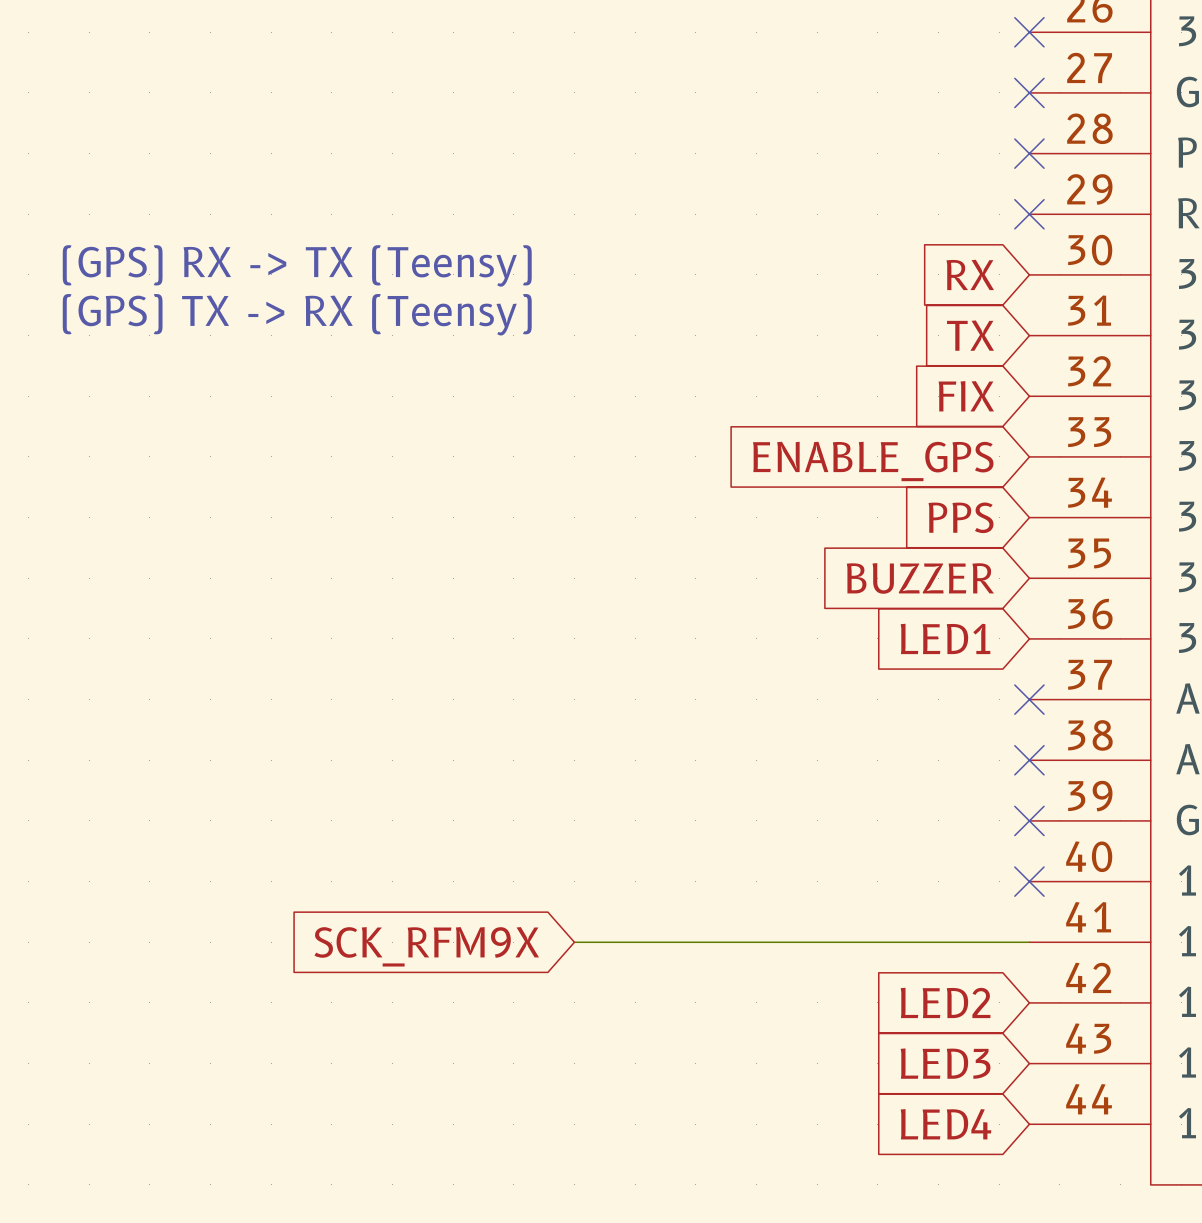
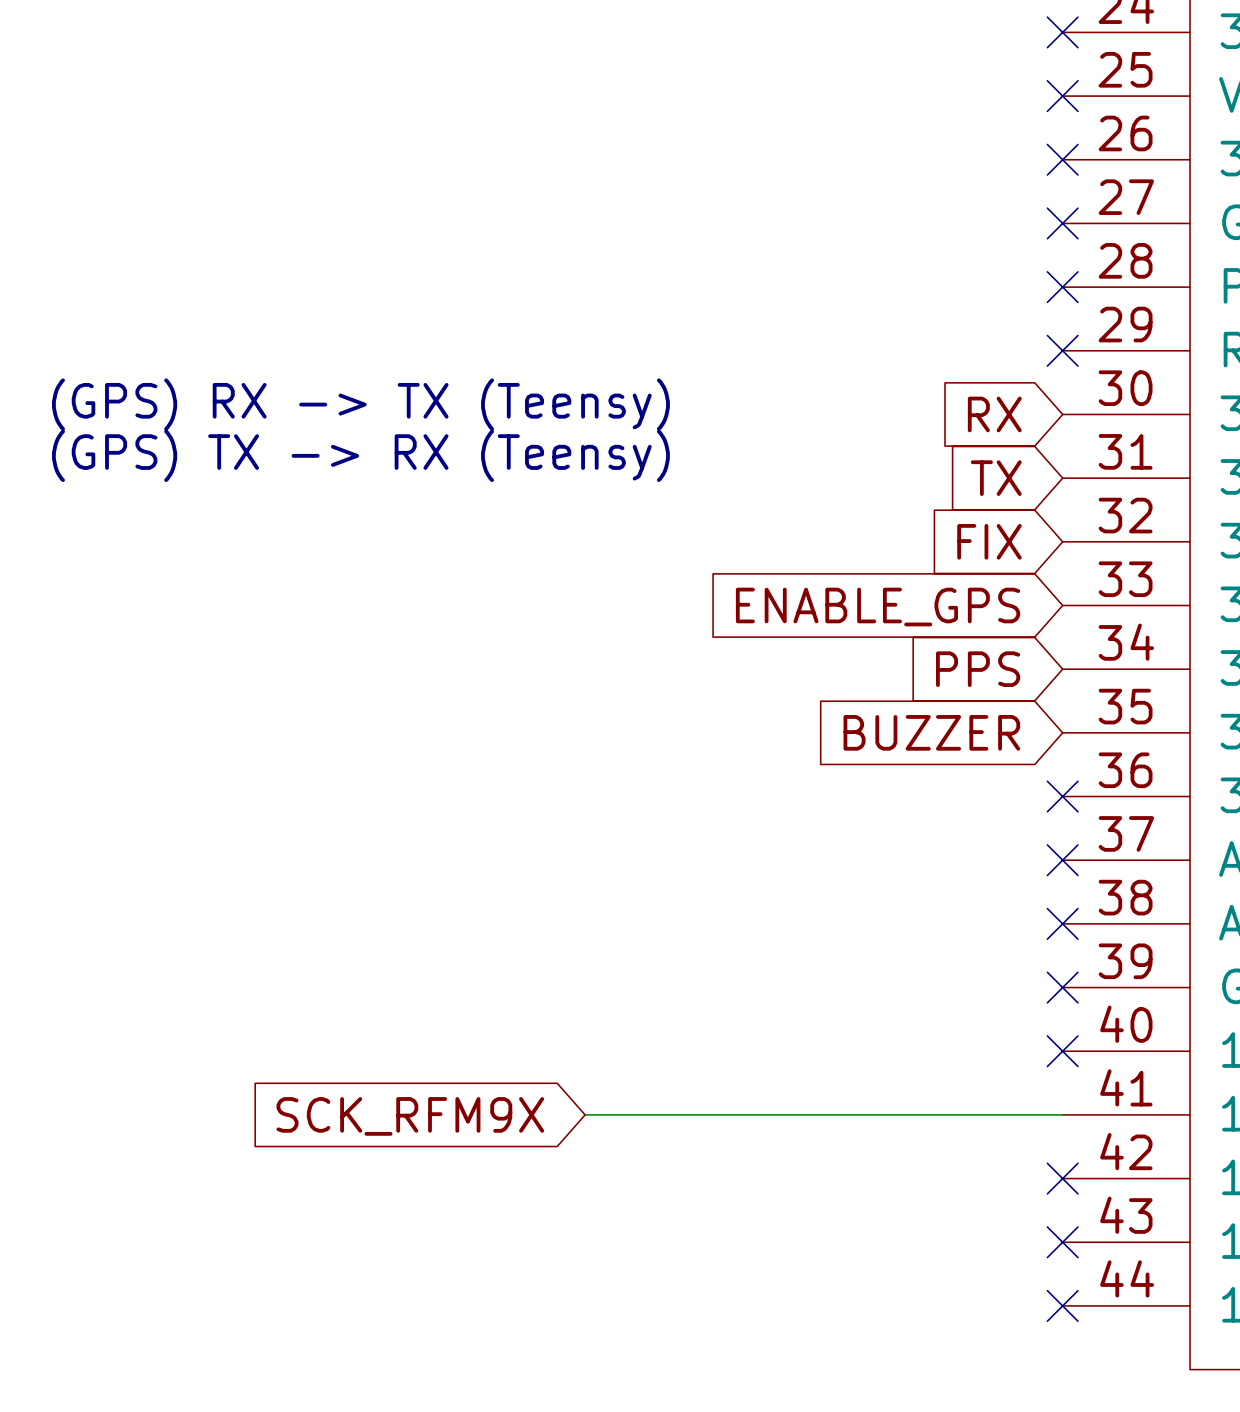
global label: LED1 (945, 638) -> none
no-connect mark: none -> (1062, 796)
global label: LED2 (945, 1002) -> none
no-connect mark: none -> (1062, 1178)
global label: LED3 (945, 1063) -> none
no-connect mark: none -> (1062, 1242)
global label: LED4 (946, 1124) -> none
no-connect mark: none -> (1062, 1305)

